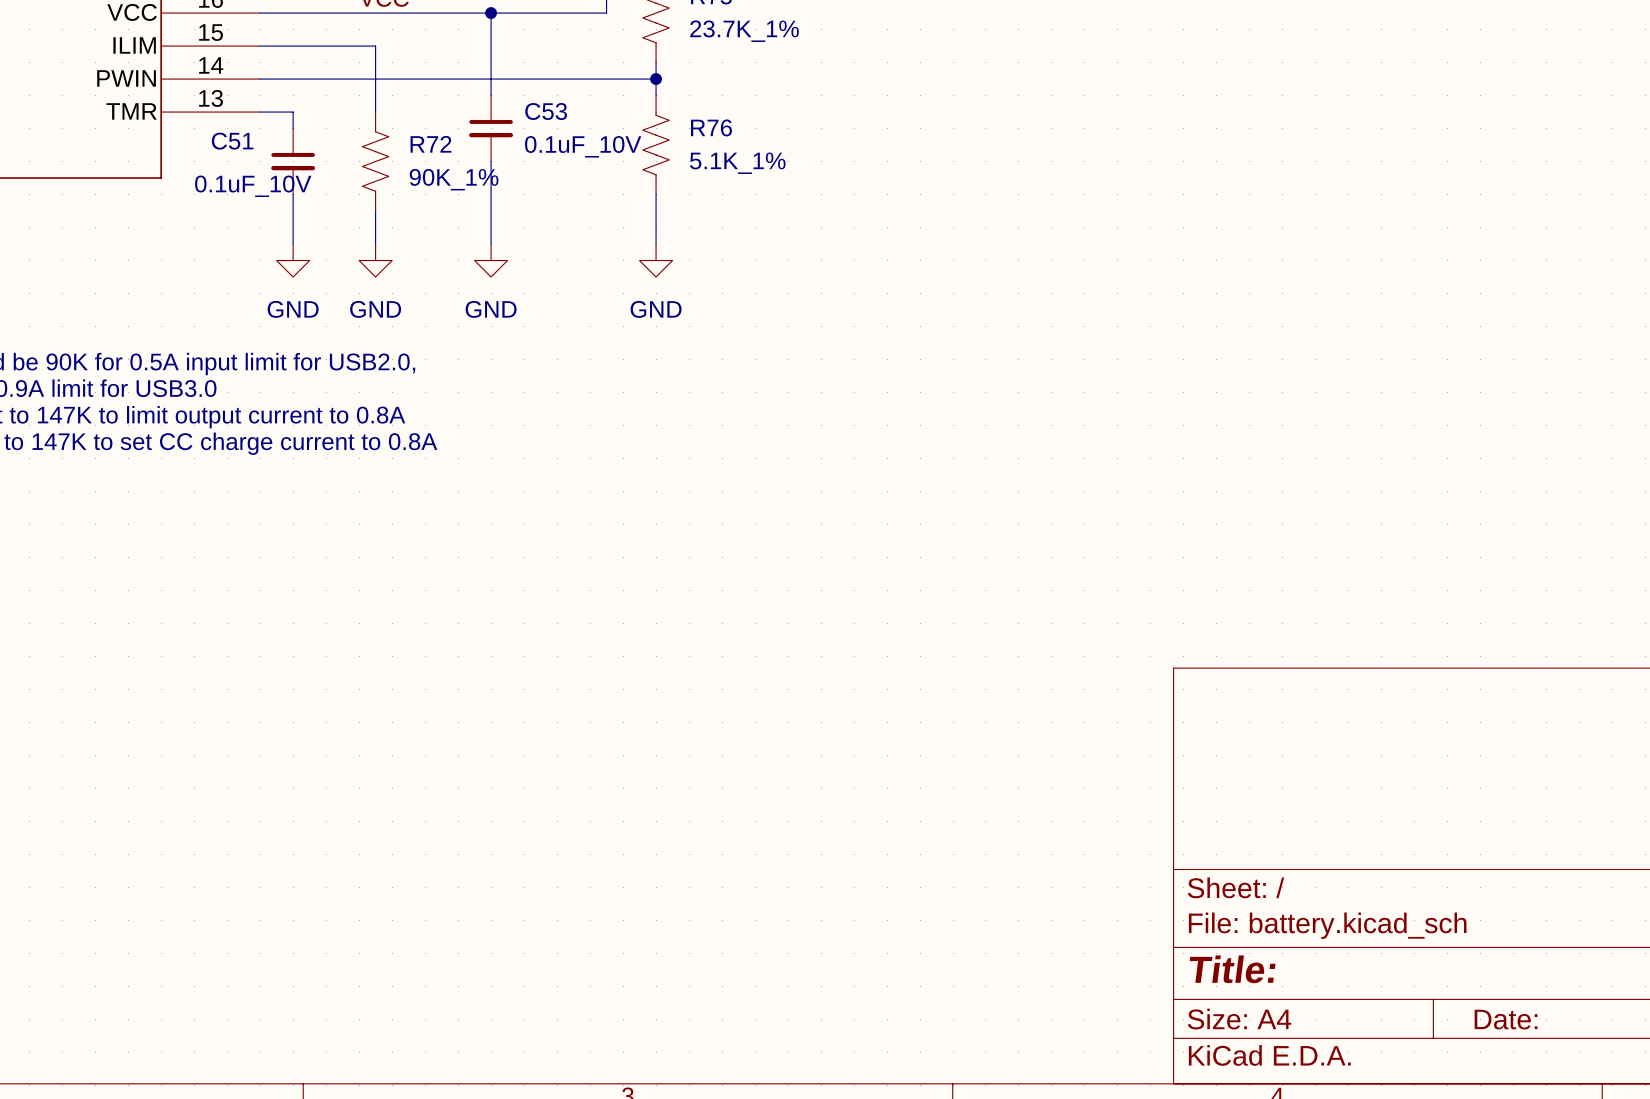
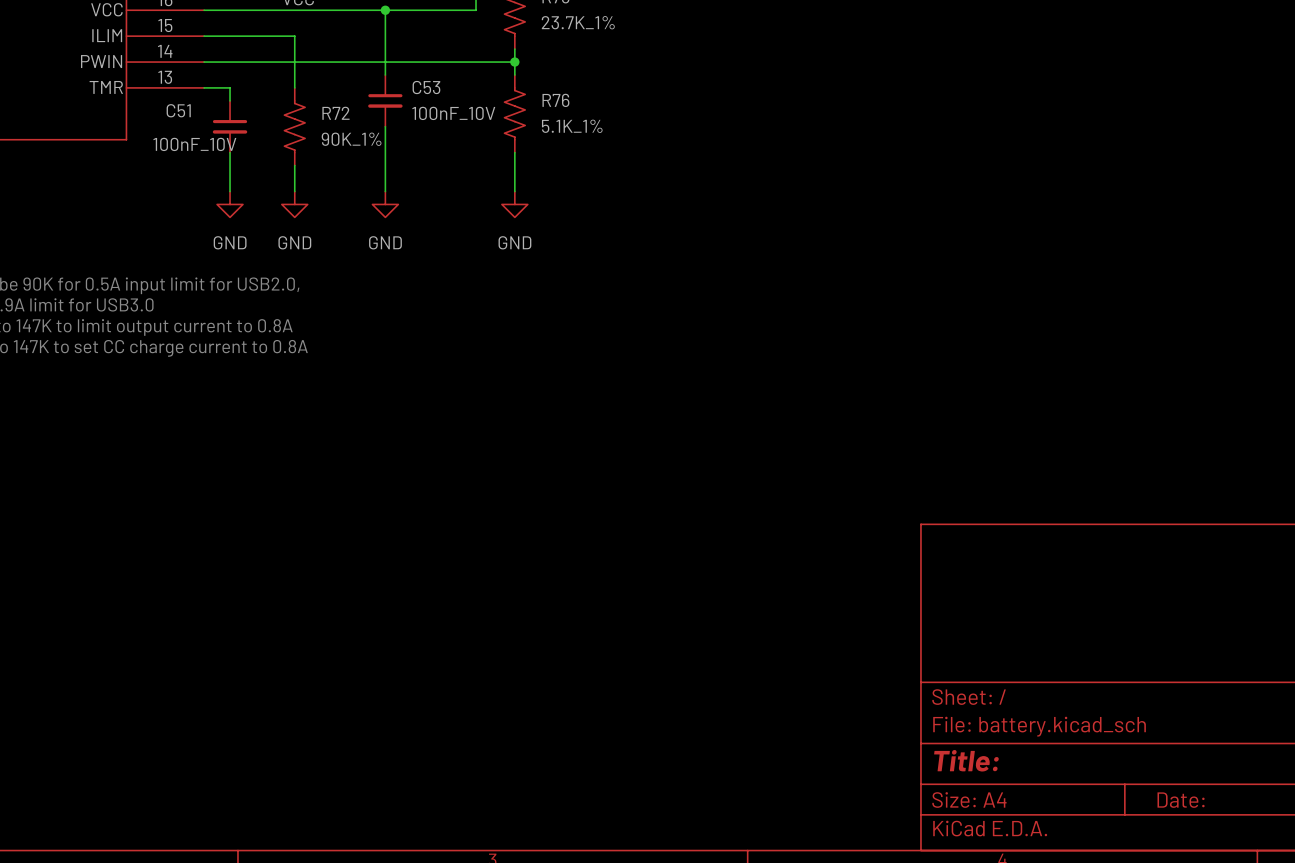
C53 value: 0.1uF_10V (583, 146) -> 100nF_10V (453, 113)
C51 value: 0.1uF_10V (253, 186) -> 100nF_10V (194, 144)

